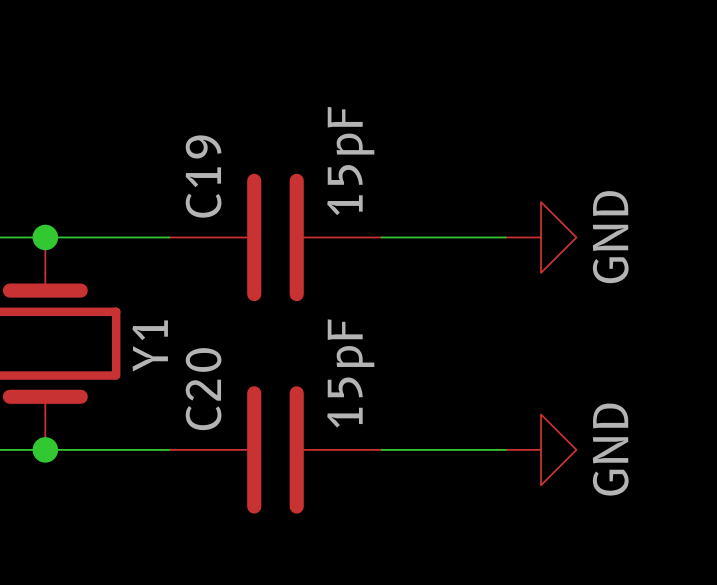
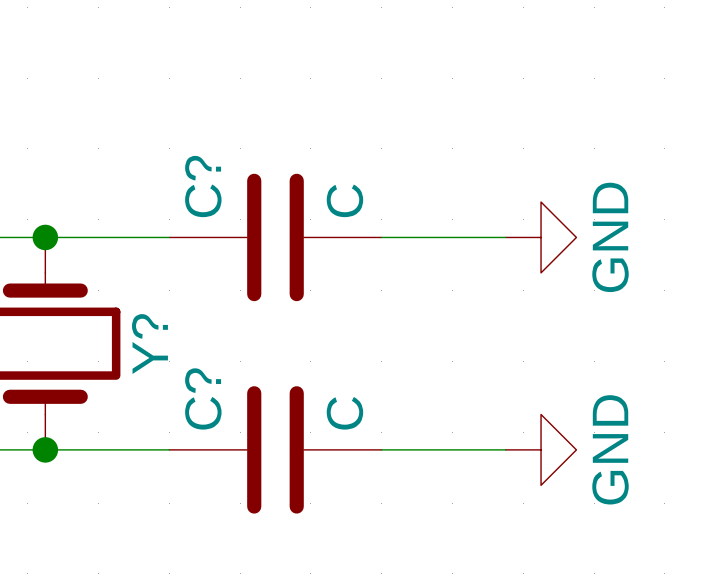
C19 value: 15pF (350, 161) -> C (344, 200)
C19 name: C19 (203, 176) -> C? (203, 186)
Y1 name: Y1 (150, 345) -> Y? (149, 344)
C20 value: 15pF (350, 373) -> C (344, 413)
C20 name: C20 (203, 389) -> C? (203, 398)

